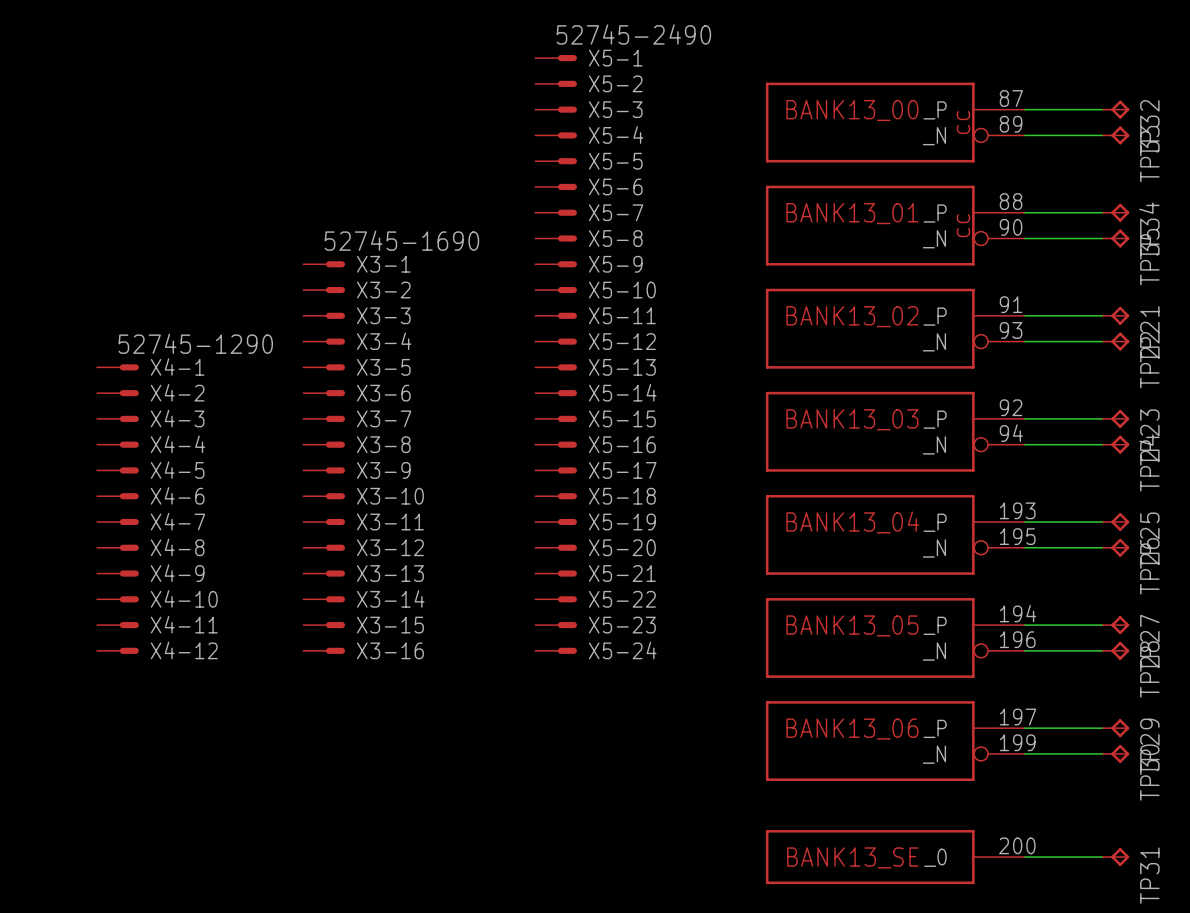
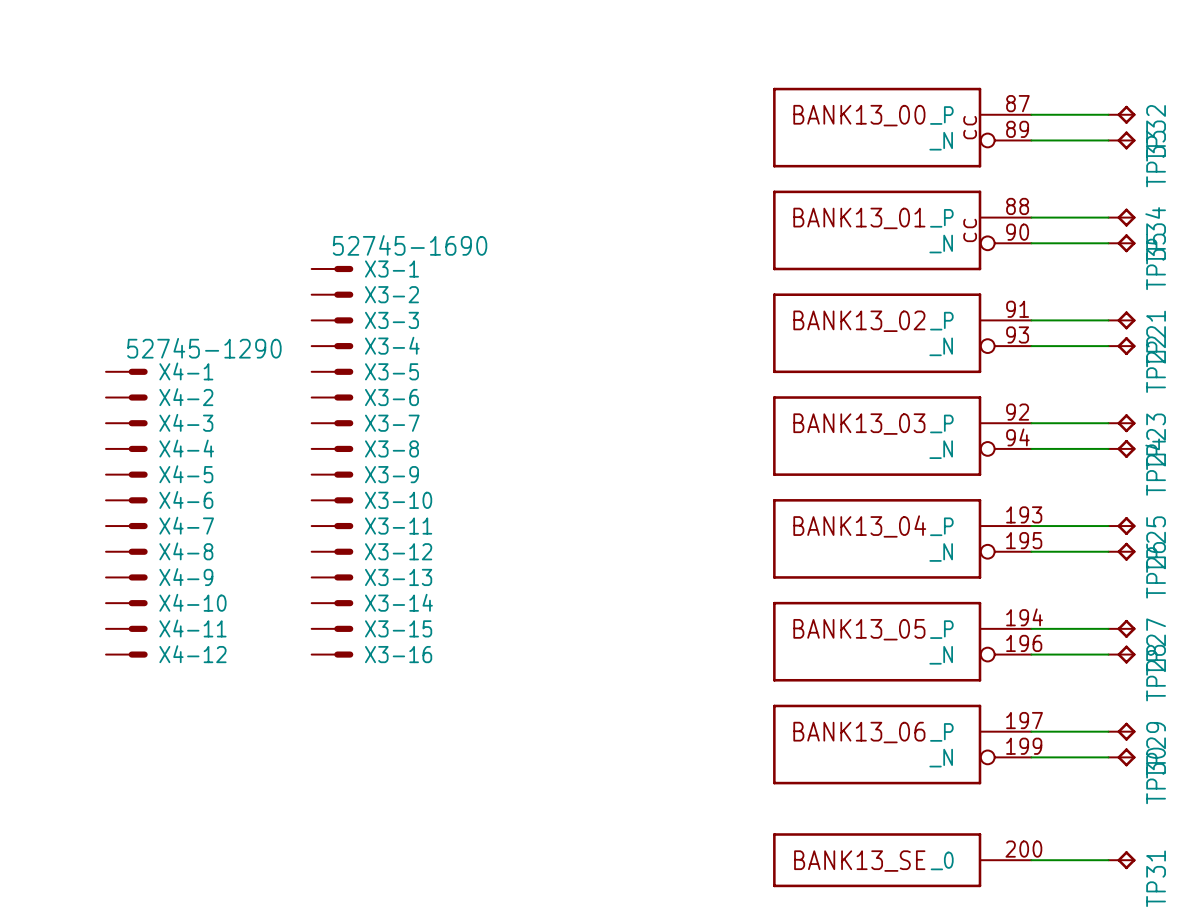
X5-1: 52745-2490 (556, 58) -> none
X5-2: (556, 83) -> none
X5-3: (556, 109) -> none
X5-4: (556, 135) -> none
X5-5: (556, 161) -> none
X5-6: (556, 186) -> none
X5-7: (556, 212) -> none
X5-8: (556, 238) -> none
X5-9: (556, 264) -> none
X5-10: (556, 290) -> none
X5-11: (556, 315) -> none
X5-12: (556, 341) -> none
X5-13: (556, 367) -> none
X5-14: (556, 393) -> none
X5-15: (556, 418) -> none
X5-16: (556, 444) -> none
X5-17: (556, 470) -> none
X5-18: (556, 496) -> none
X5-19: (556, 522) -> none
X5-20: (556, 547) -> none
X5-21: (556, 573) -> none
X5-22: (556, 599) -> none
X5-23: (556, 625) -> none
X5-24: (556, 650) -> none

